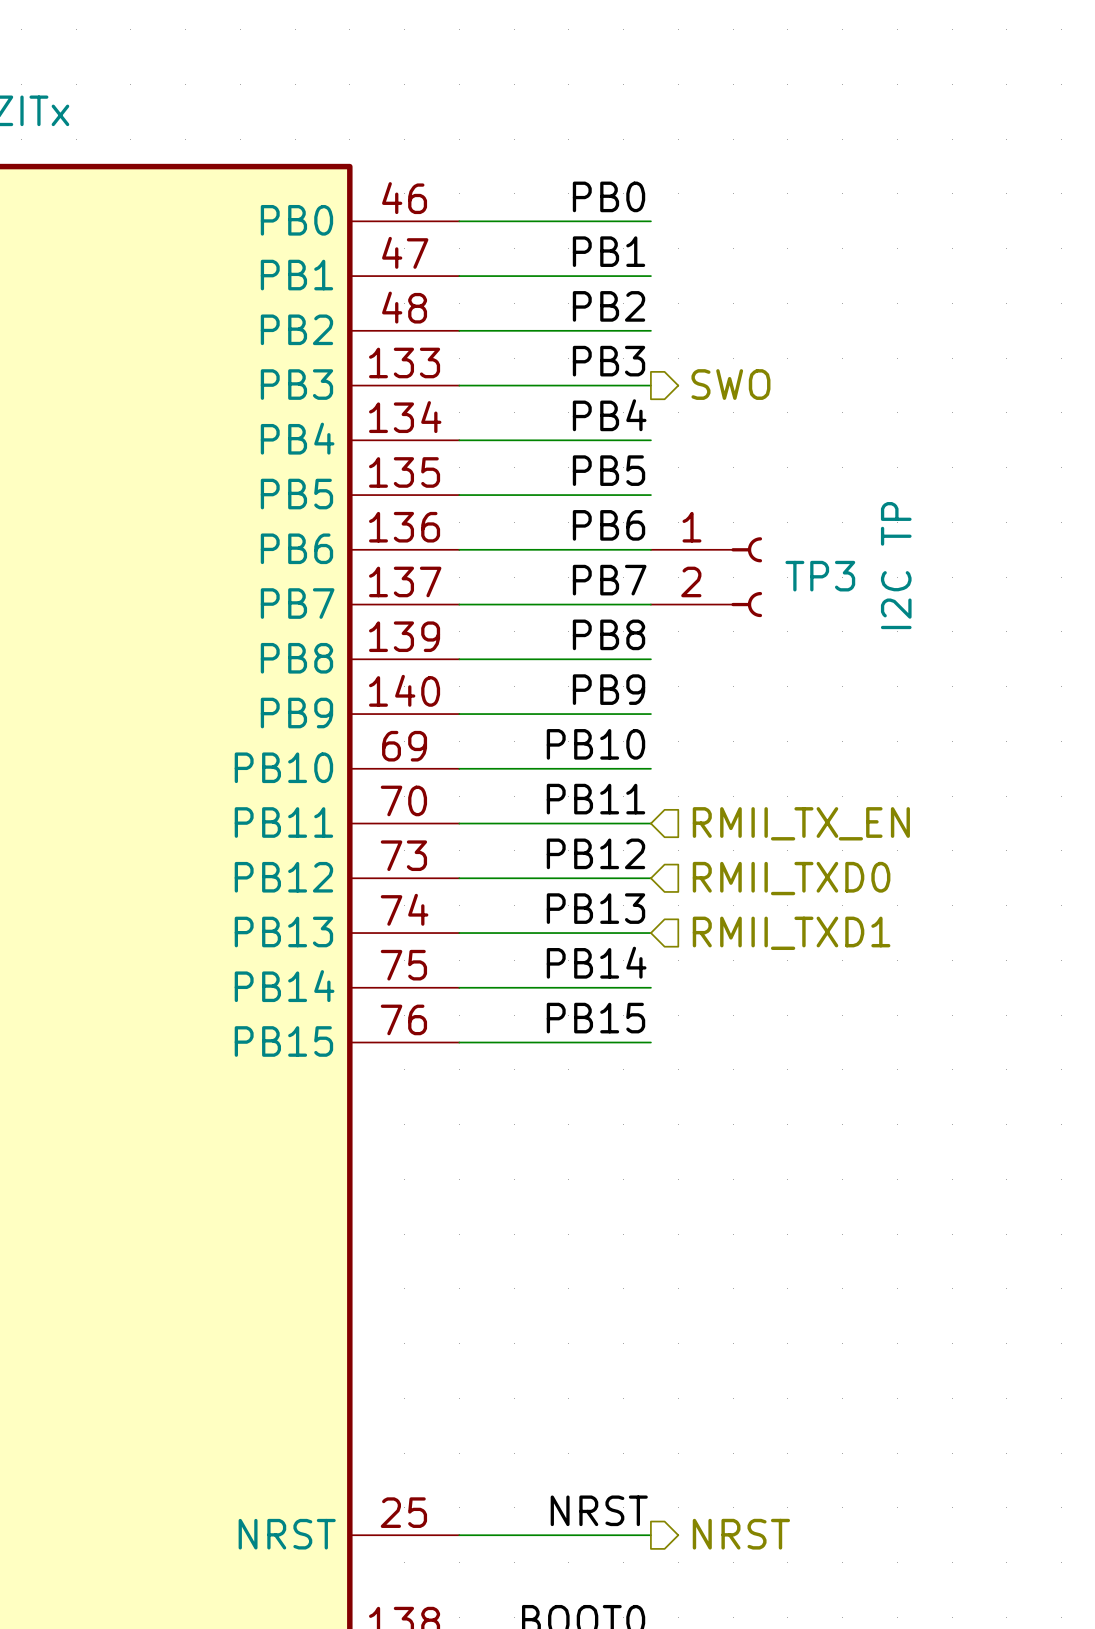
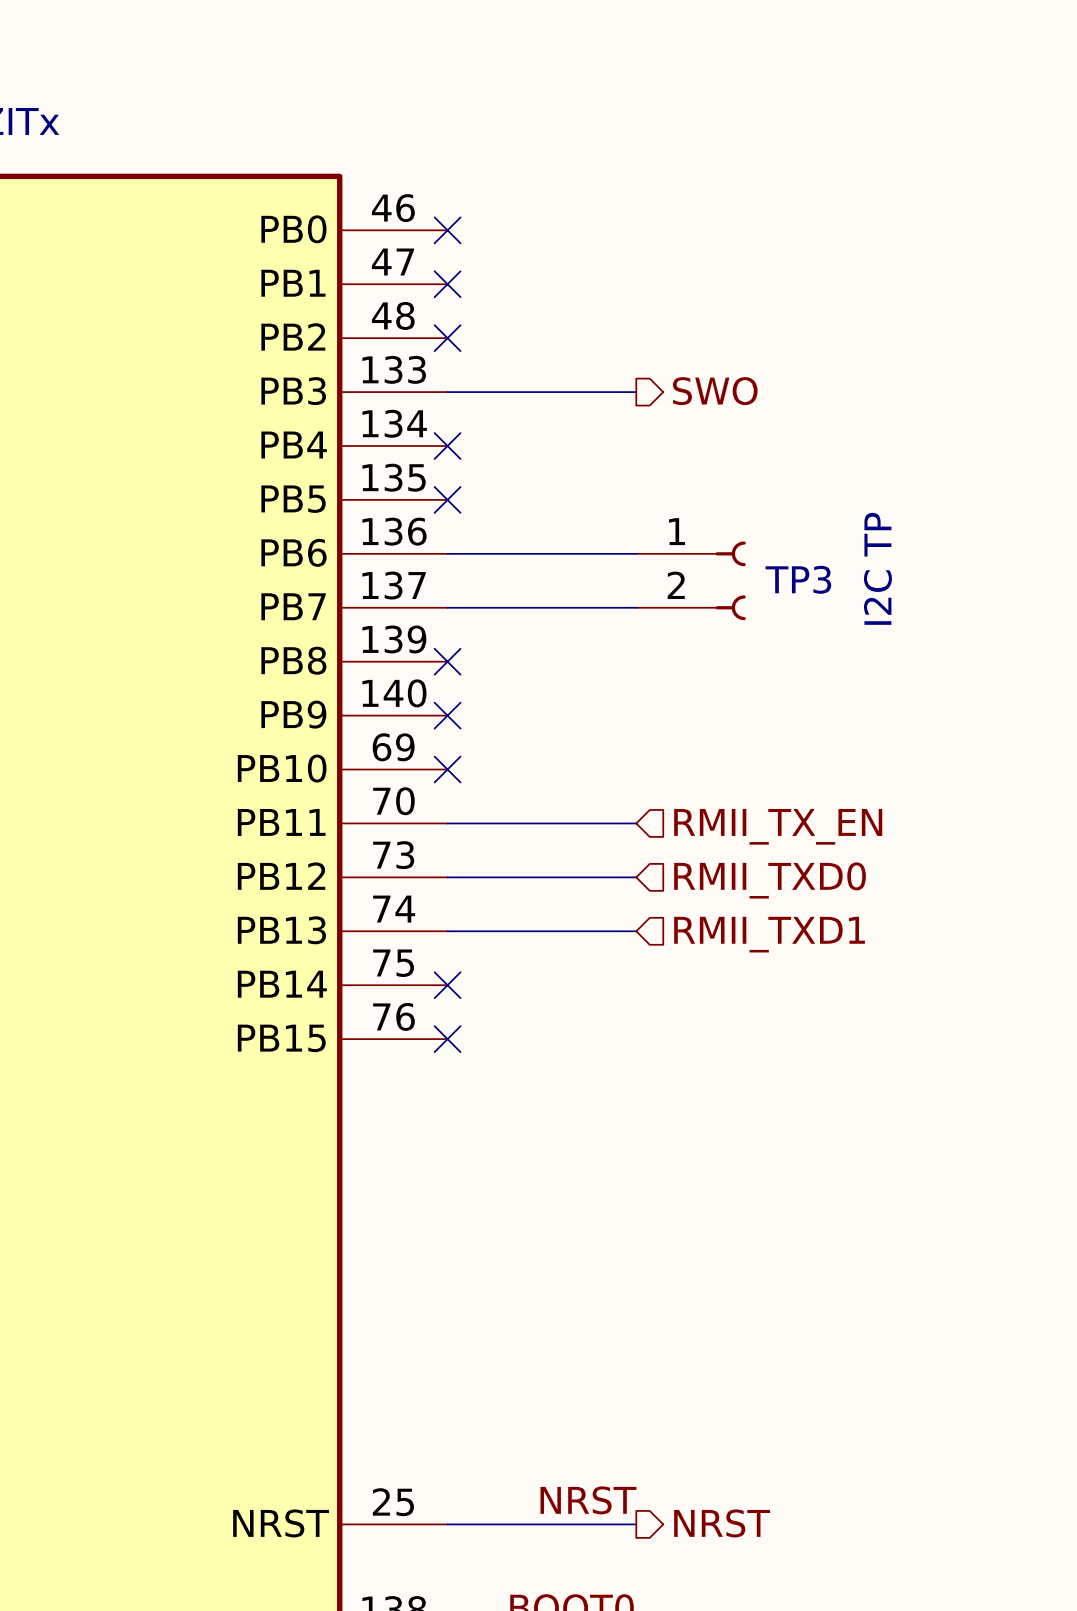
label: PB0 (609, 196) -> none
wire: (459, 221) (650, 221) -> none
no-connect mark: none -> (447, 230)
label: PB1 (609, 251) -> none
wire: (459, 276) (650, 276) -> none
no-connect mark: none -> (447, 284)
label: PB2 (609, 306) -> none
wire: (459, 330) (650, 330) -> none
no-connect mark: none -> (447, 338)
label: PB3 (609, 361) -> none
label: PB4 (609, 415) -> none
wire: (459, 440) (650, 440) -> none
no-connect mark: none -> (447, 446)
label: PB5 (609, 470) -> none
wire: (459, 495) (650, 495) -> none
no-connect mark: none -> (447, 499)
label: PB6 (609, 525) -> none
label: PB7 (609, 580) -> none
label: PB8 (609, 634) -> none
wire: (459, 659) (650, 659) -> none
no-connect mark: none -> (447, 661)
label: PB9 (609, 689) -> none
wire: (459, 714) (650, 714) -> none
no-connect mark: none -> (447, 715)
label: PB10 (595, 744) -> none
wire: (459, 768) (650, 768) -> none
no-connect mark: none -> (447, 769)
label: PB11 (595, 799) -> none
label: PB12 (595, 853) -> none
label: PB13 (595, 908) -> none
label: PB14 (596, 962) -> none
wire: (459, 987) (650, 987) -> none
no-connect mark: none -> (447, 985)
label: PB15 (595, 1018) -> none
wire: (459, 1042) (650, 1042) -> none
no-connect mark: none -> (447, 1039)

